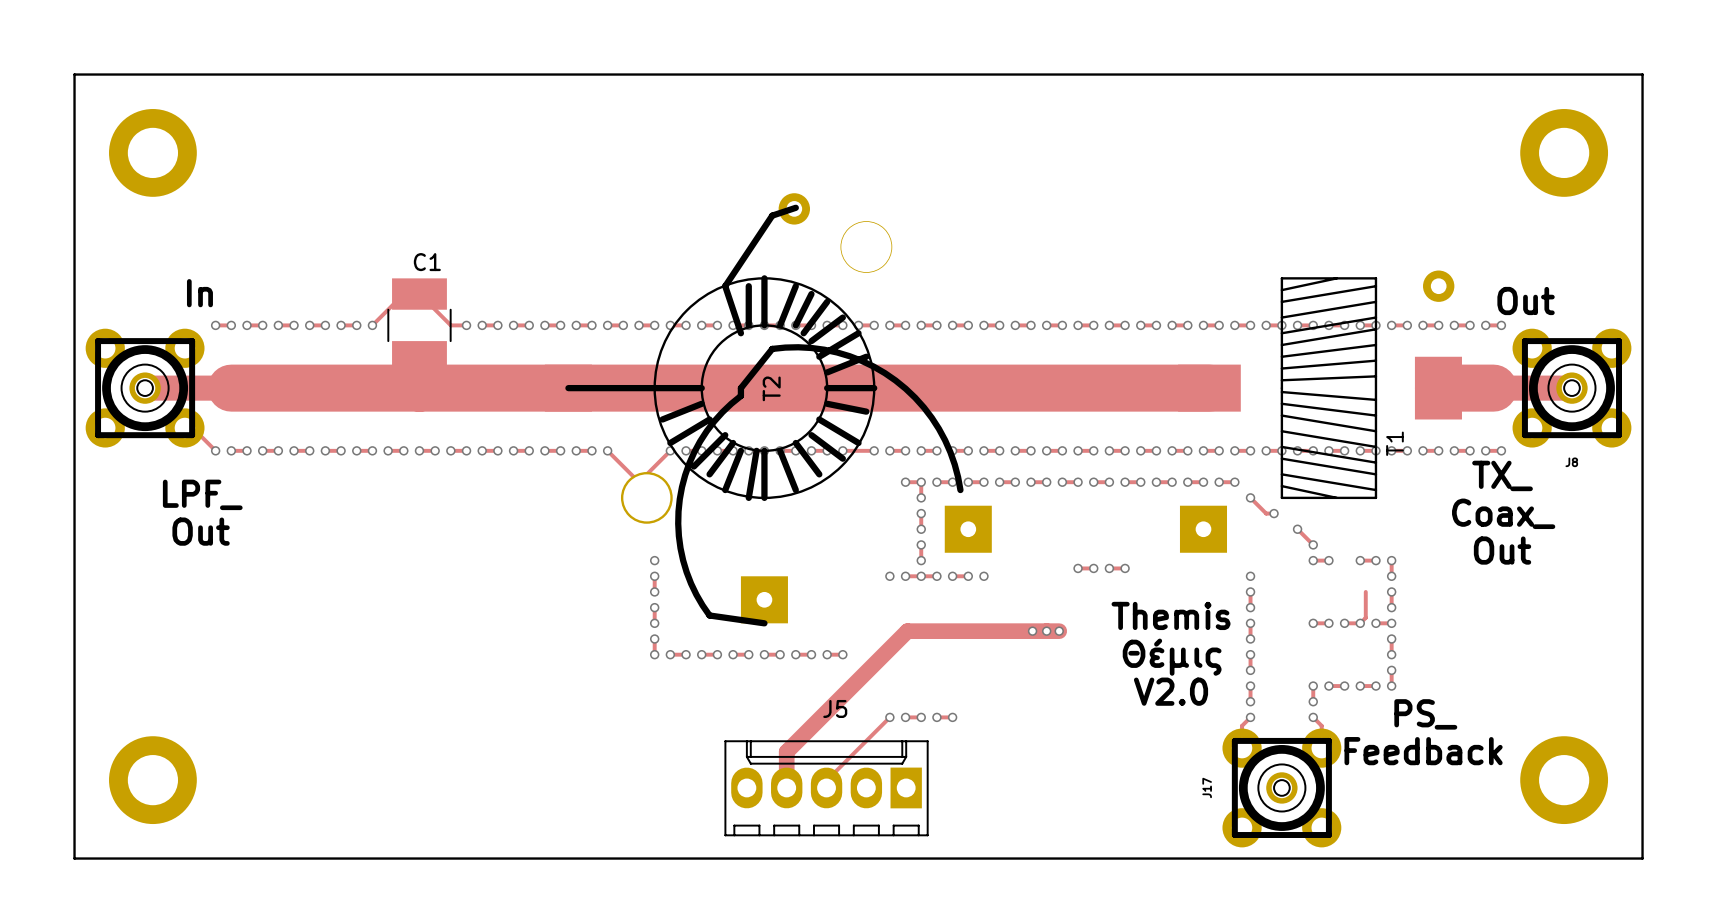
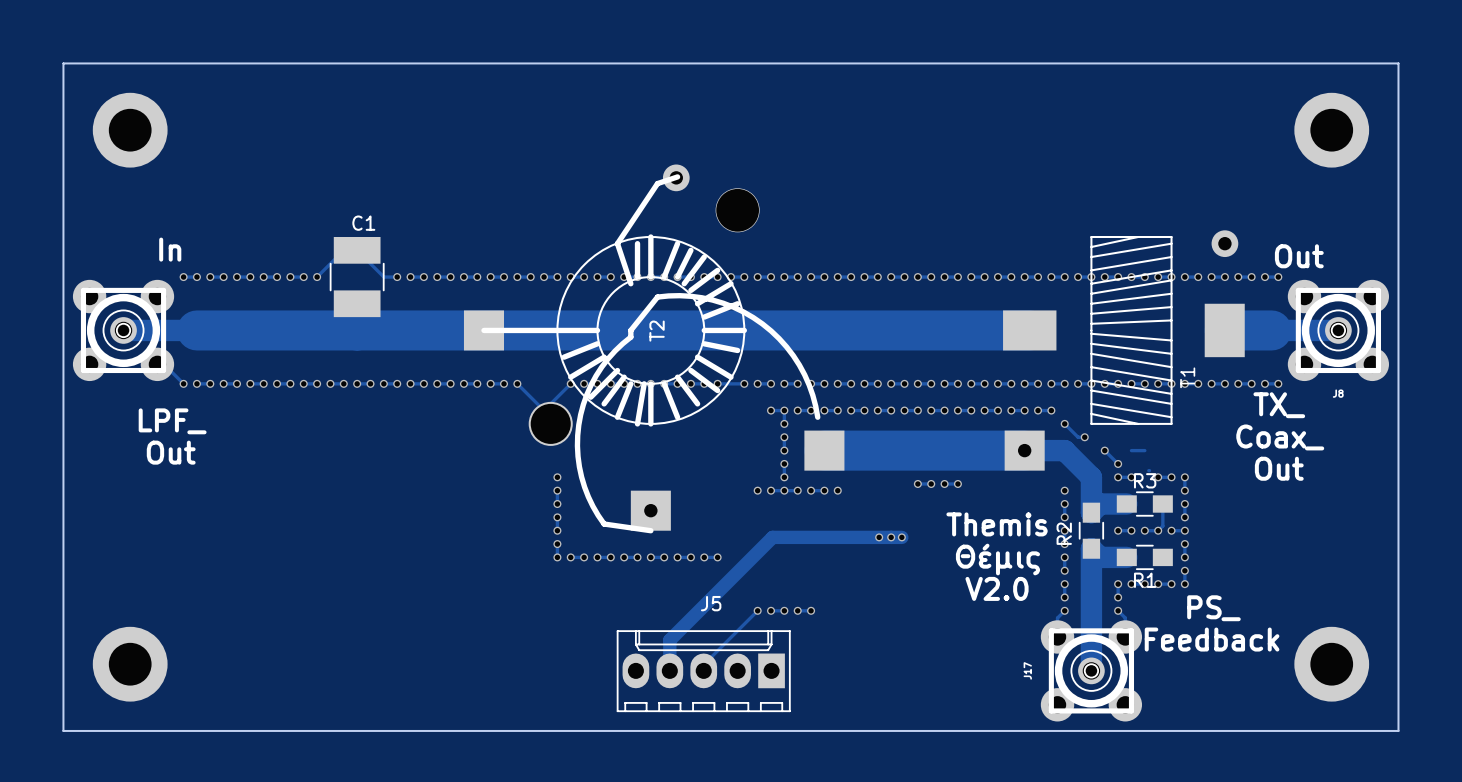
T2 footprint: [544, 193, 992, 627] -> [463, 164, 845, 534]
track: none -> (824, 450) (1064, 450) (1091, 477) (1091, 512) (1100, 504) (1126, 504)
track: none -> (1131, 450) (1144, 450)
track: none -> (1148, 470) (1149, 470)
R3: none -> (1144, 504)
R2: none -> (1091, 530)
track: none -> (1126, 557) (1100, 557) (1091, 548) (1091, 670)
R1: none -> (1144, 557)

